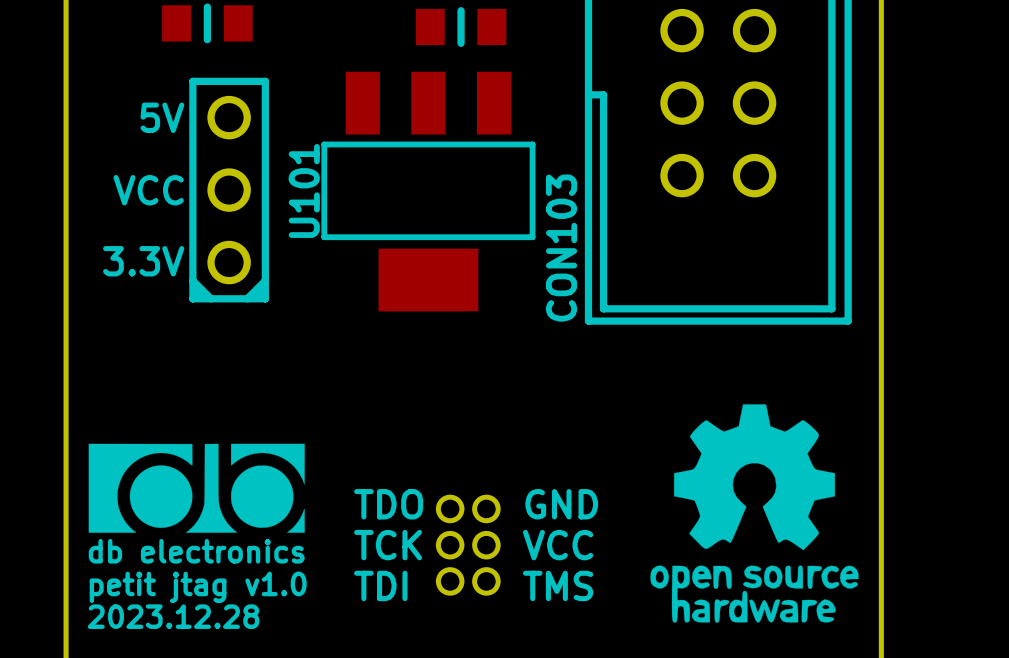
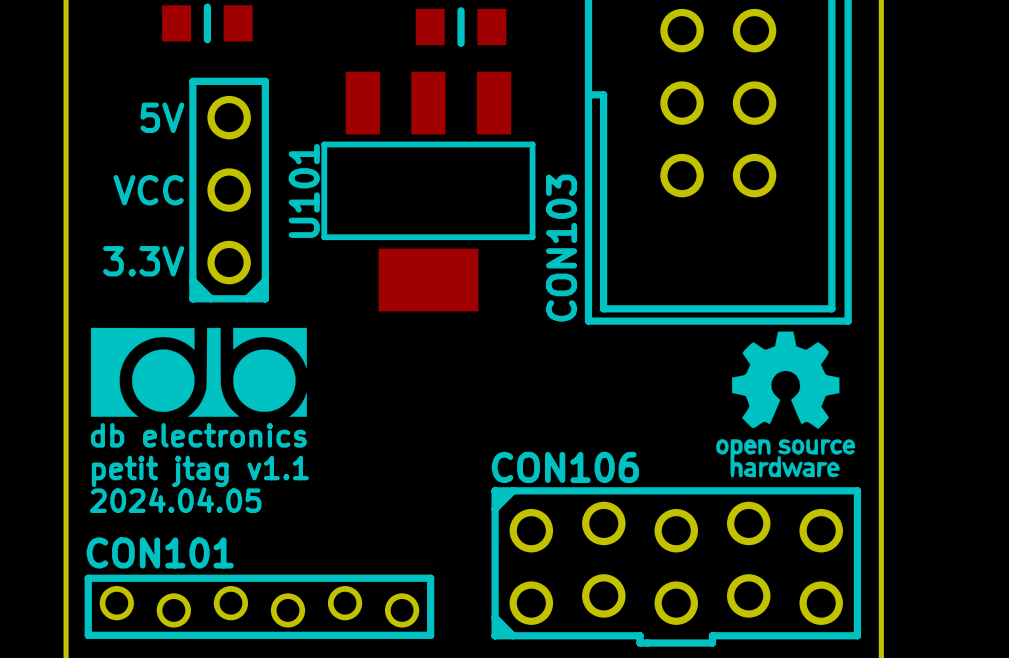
drawing: none -> [716, 331, 856, 478]
drawing: [650, 404, 859, 623] -> none
text: none -> petit jtag v1.1 (200, 471)
drawing position: (196, 488) -> (198, 372)
text: none -> 2024.04.05 (175, 500)
text: TDO (388, 504) -> none
text: GND (561, 504) -> none
text: TCK (388, 545) -> none
part: (468, 545) -> none
text: VCC (558, 545) -> none
text position: db electronics (196, 551) -> db electronics (198, 435)
CON106: none -> (676, 566)
text: TDI (380, 585) -> none
text: TMS (558, 585) -> none
text: petit jtag v1.0 (198, 587) -> none
CON101: none -> (259, 606)
text: 2023.12.28 (173, 616) -> none

